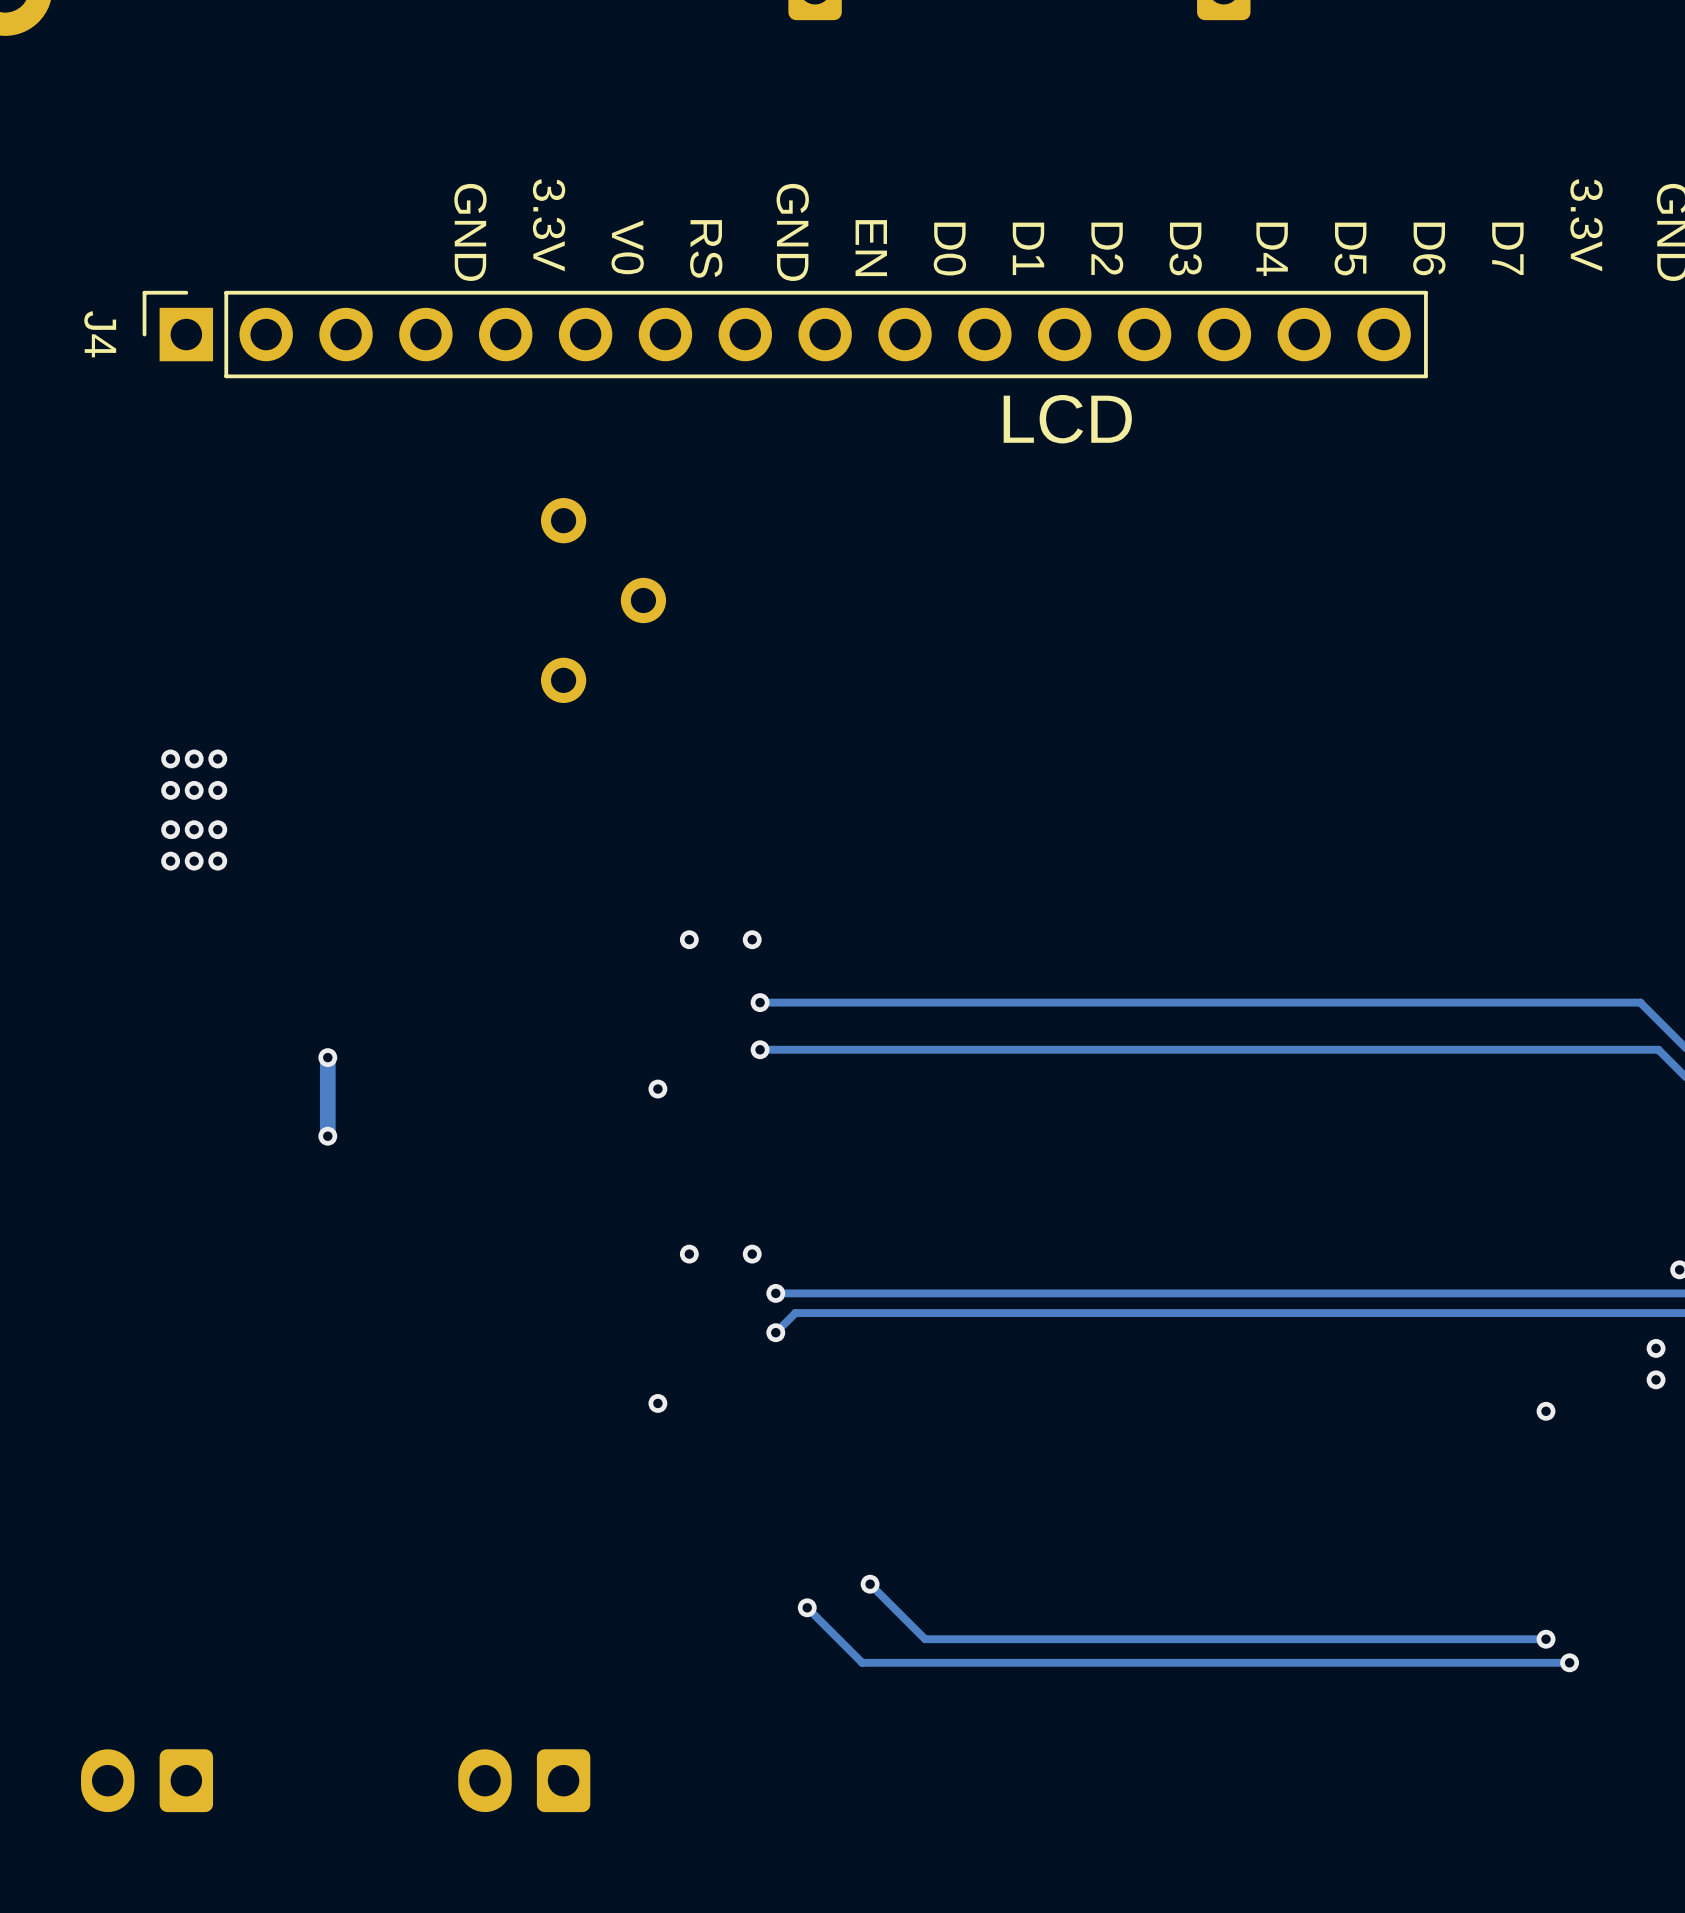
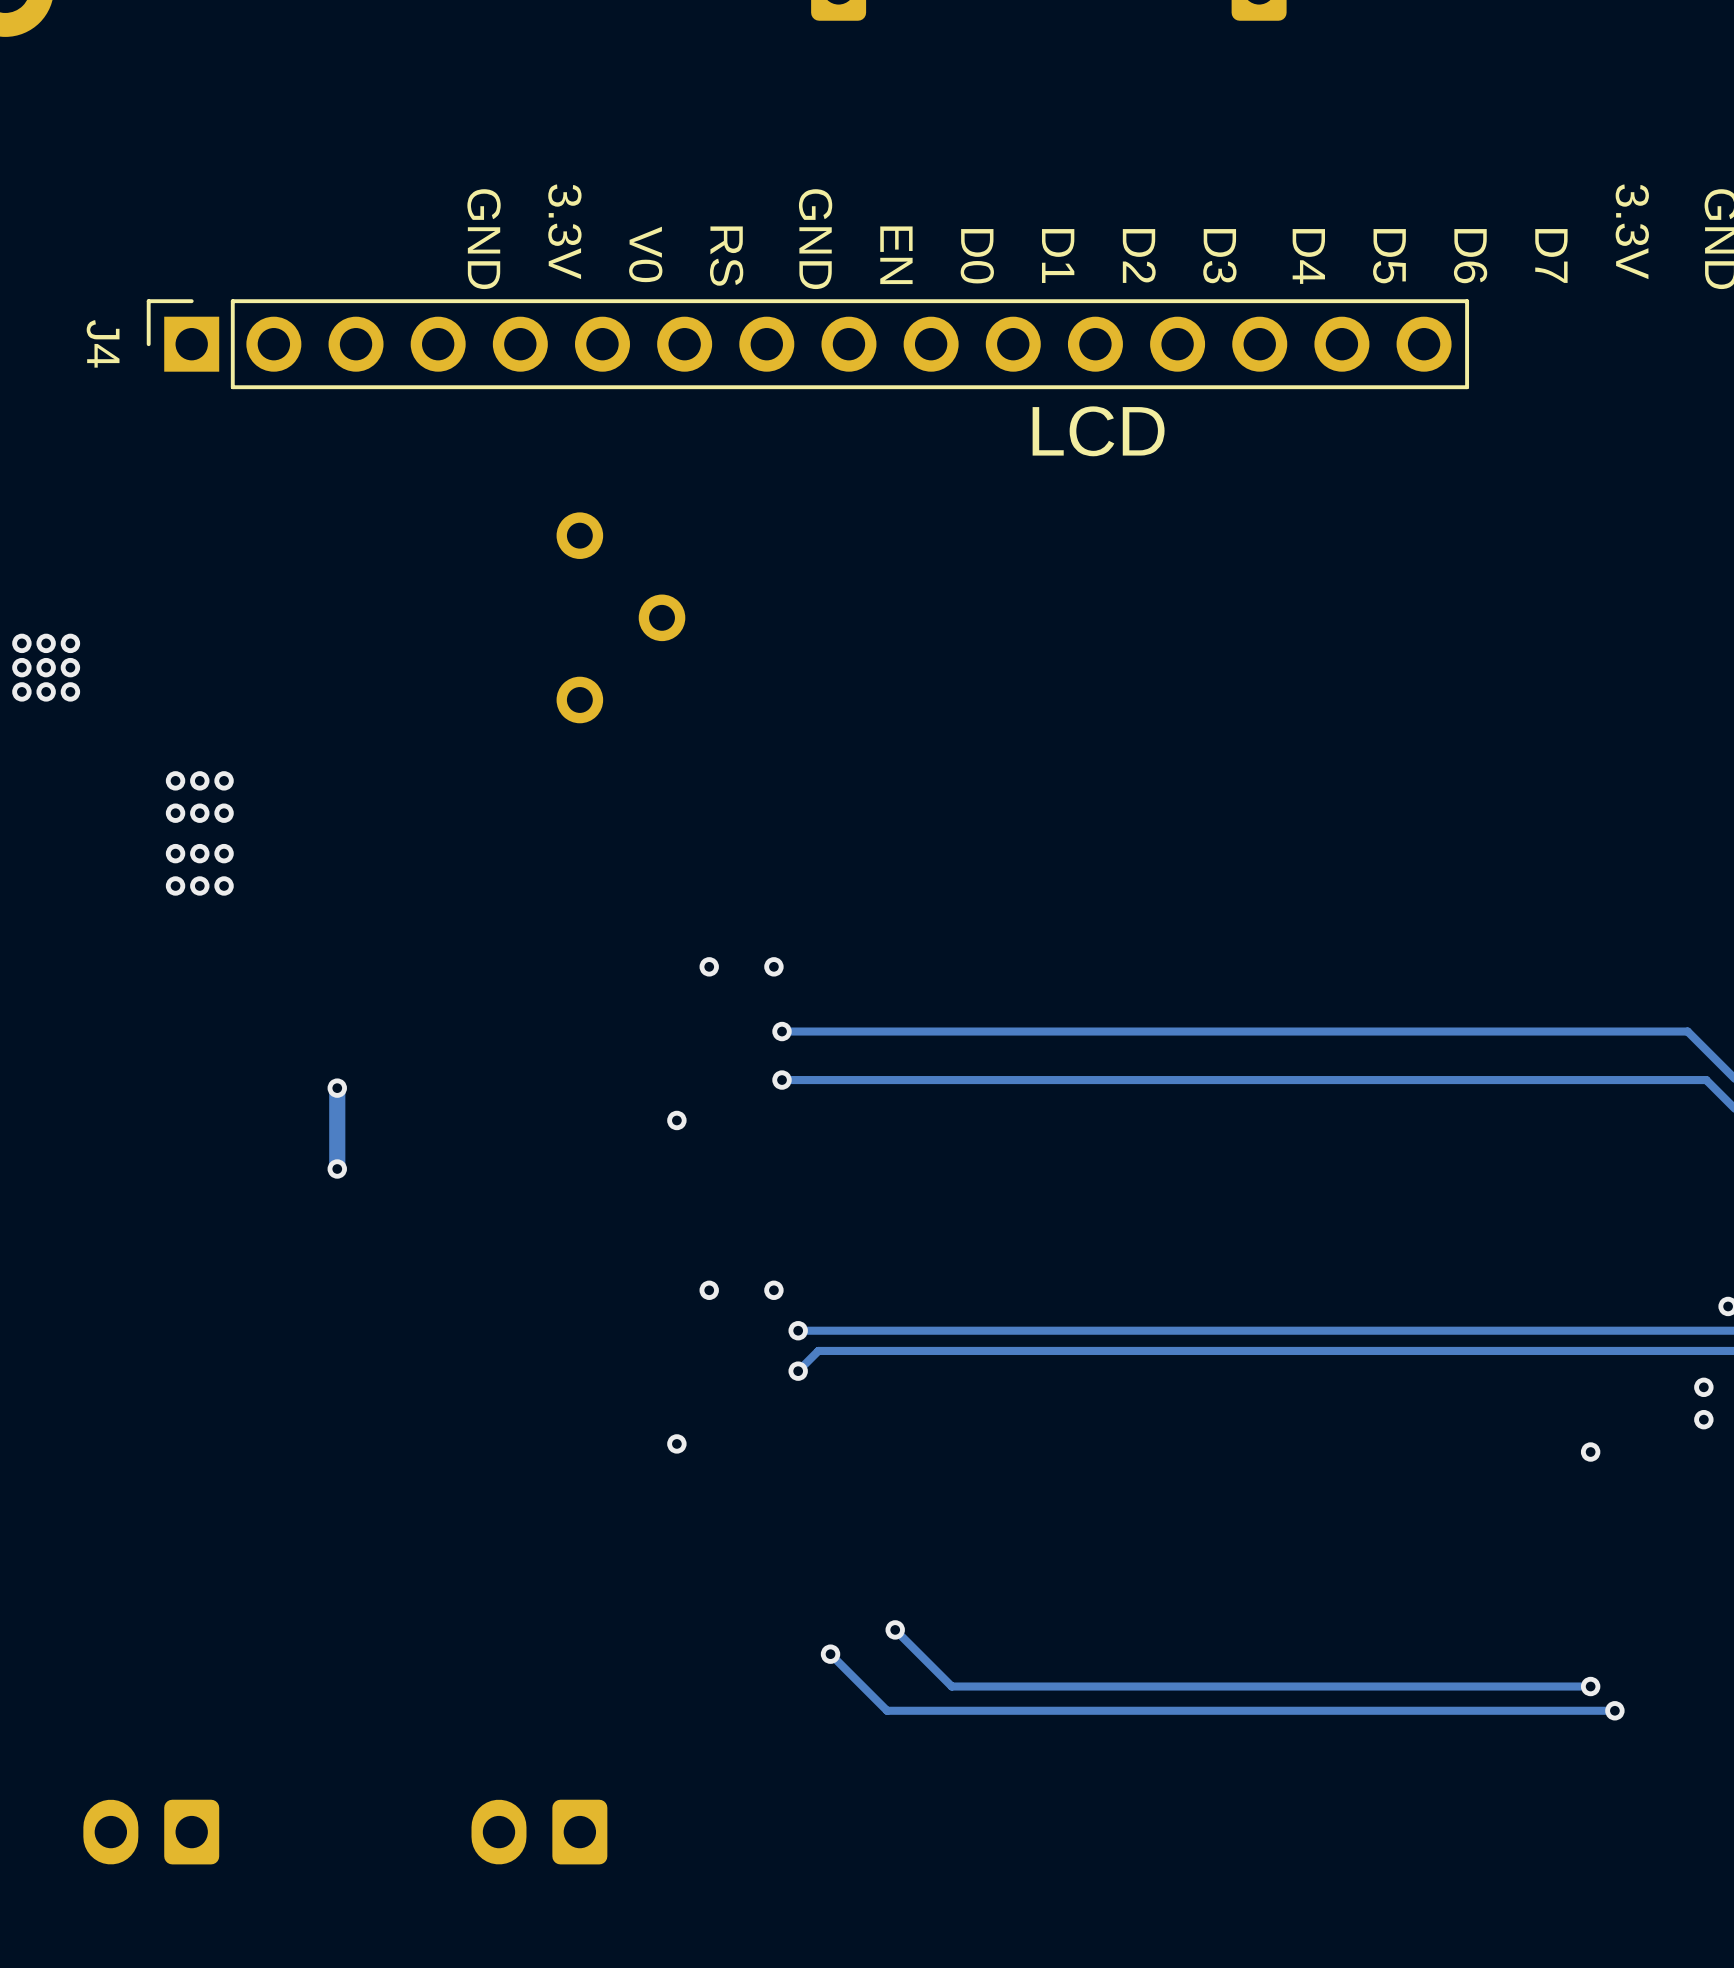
via: none -> (21, 643)
via: none -> (46, 643)
via: none -> (70, 643)
via: none -> (21, 667)
via: none -> (46, 667)
via: none -> (70, 667)
via: none -> (21, 691)
via: none -> (46, 691)
via: none -> (70, 691)

